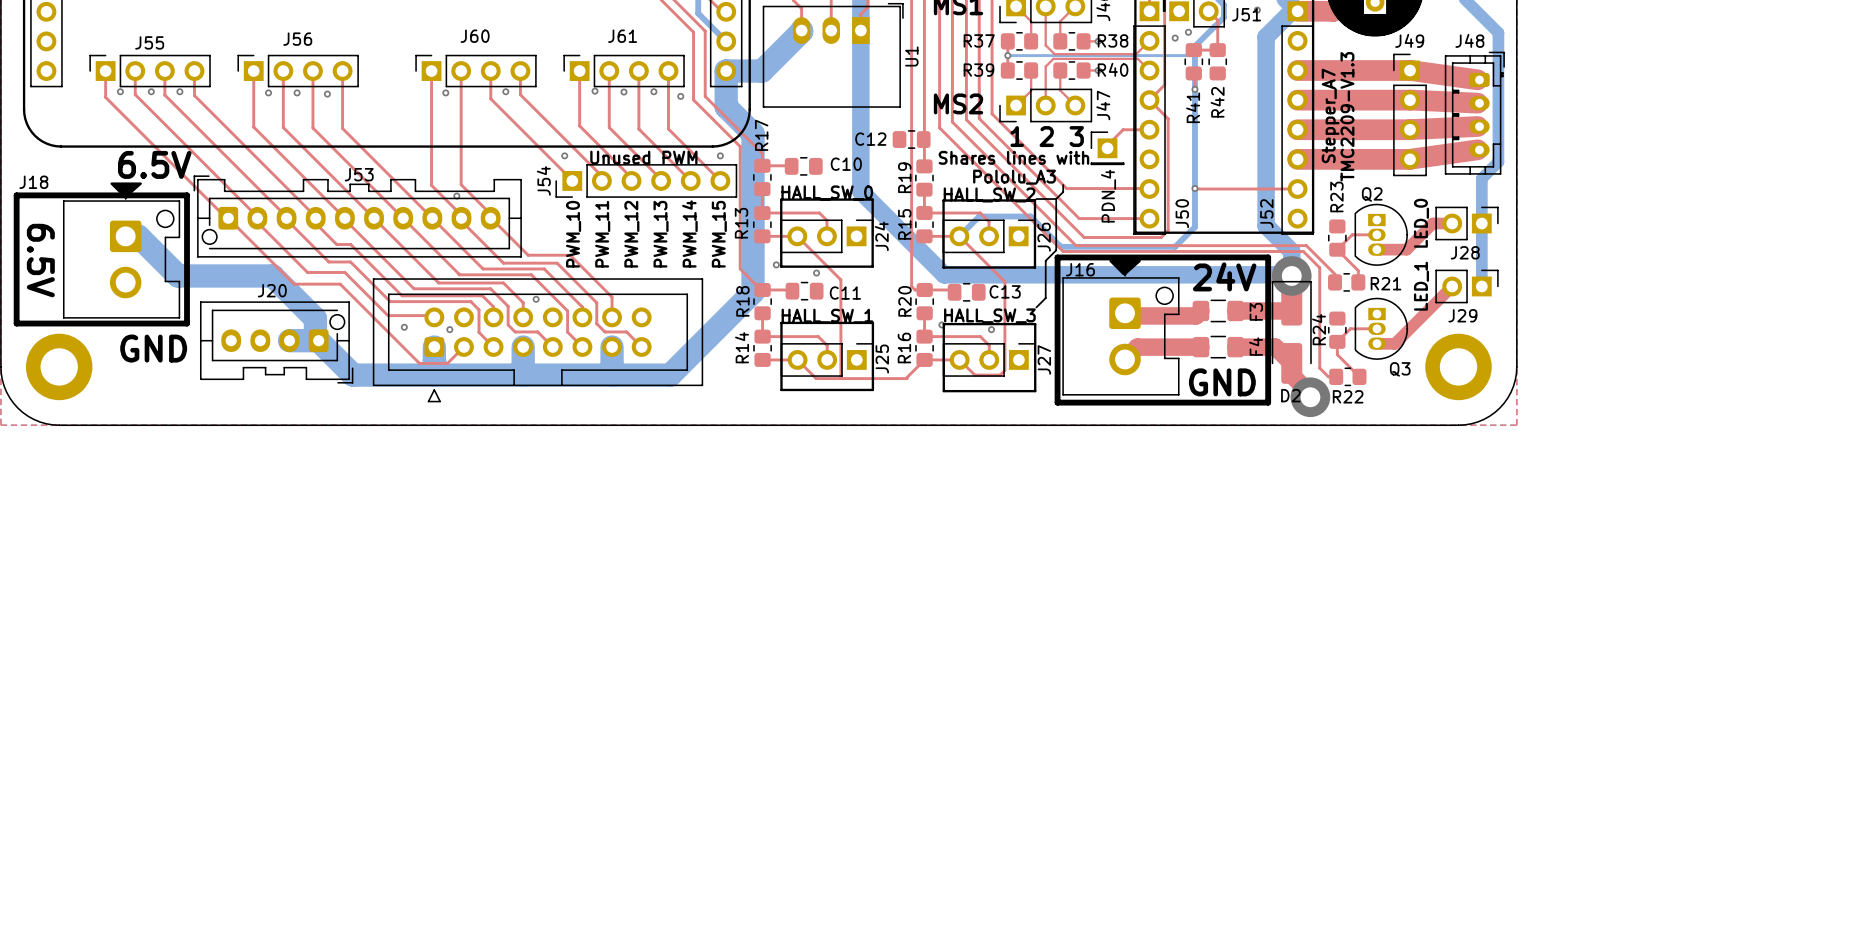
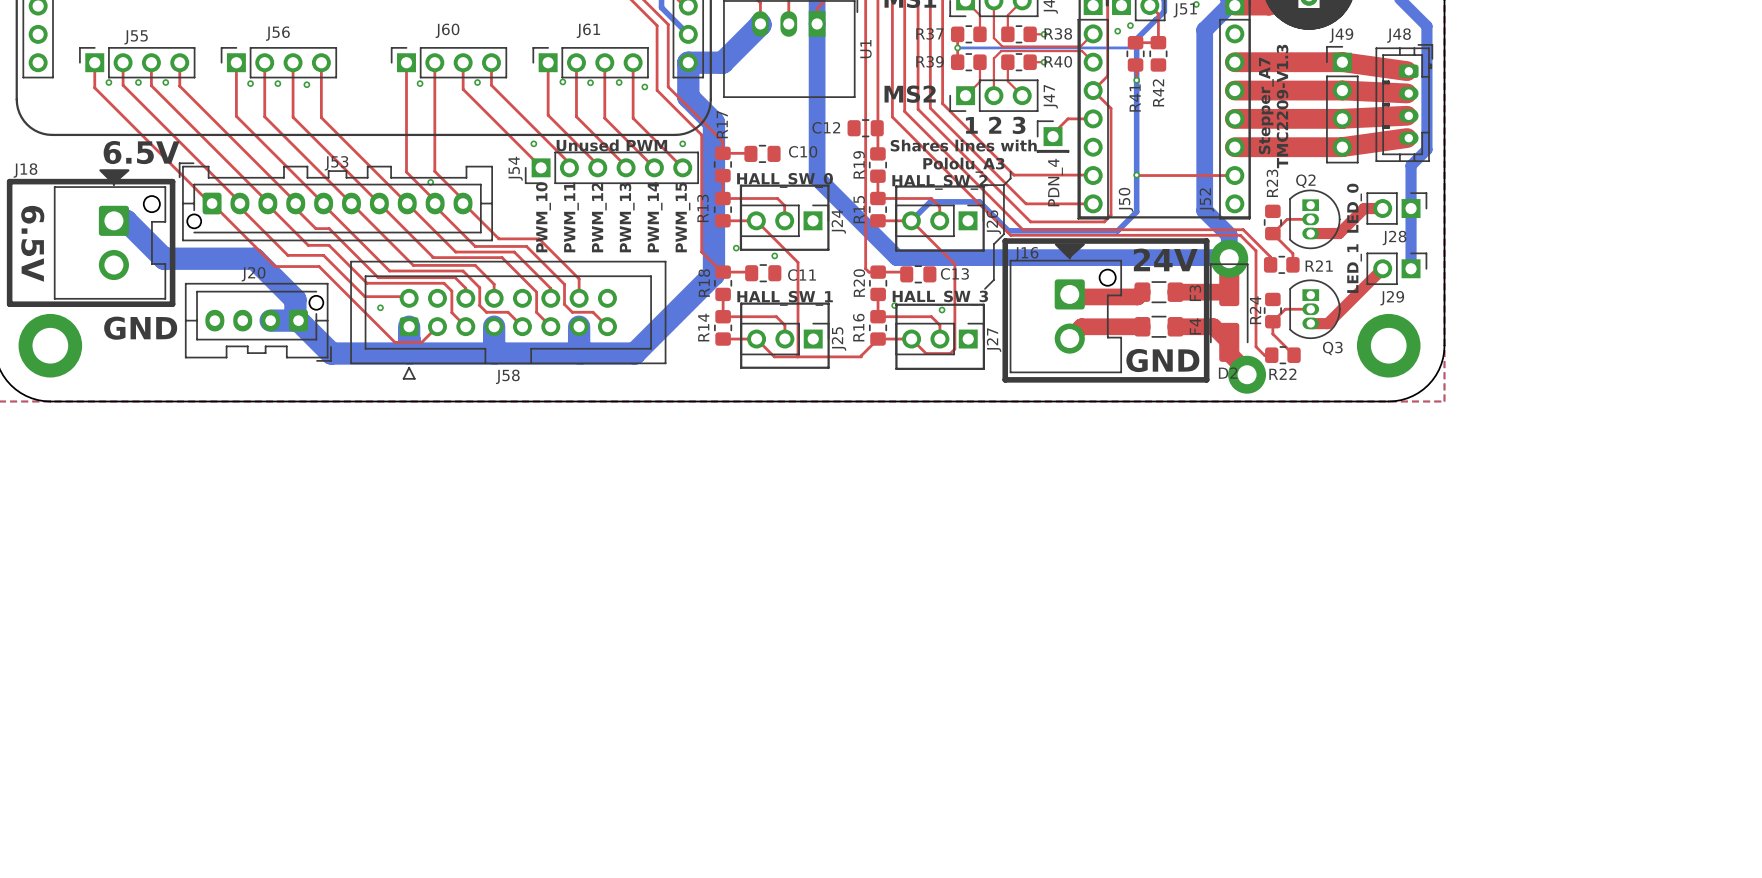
via: (536, 299) -> none
via: (449, 329) -> none
J58 name: none -> J58 (507, 376)

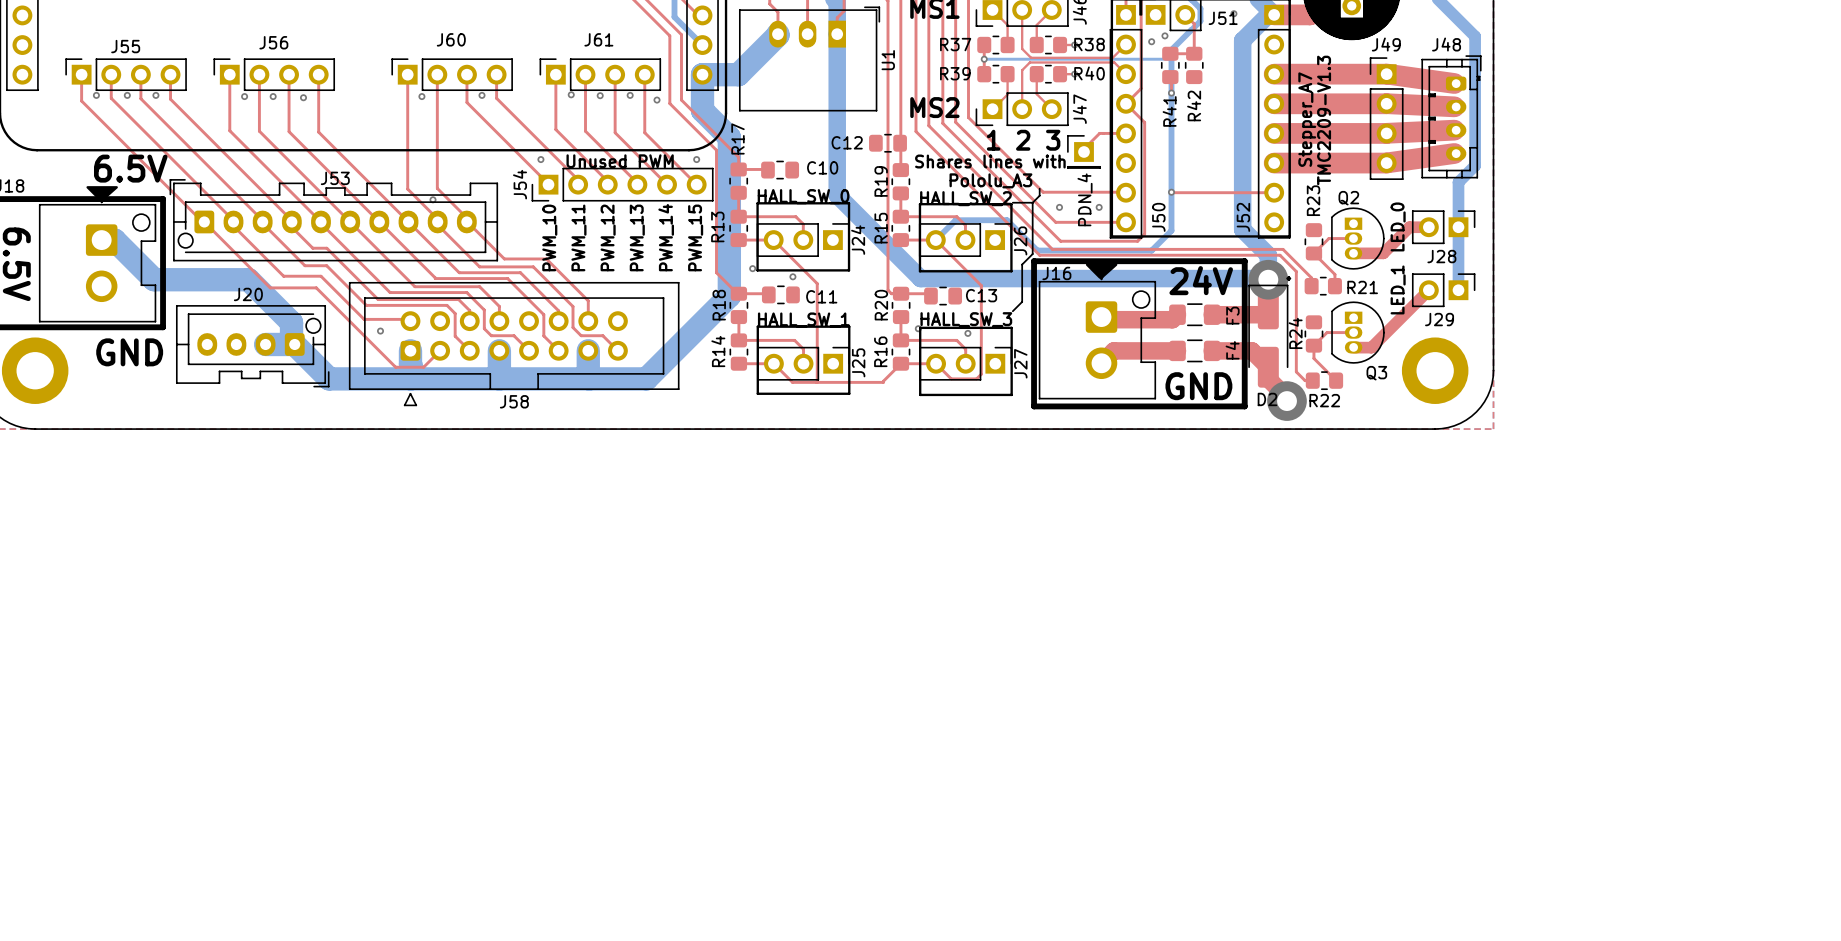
via: none -> (1059, 207)
via: none -> (1099, 207)
text: none -> . (1288, 278)

